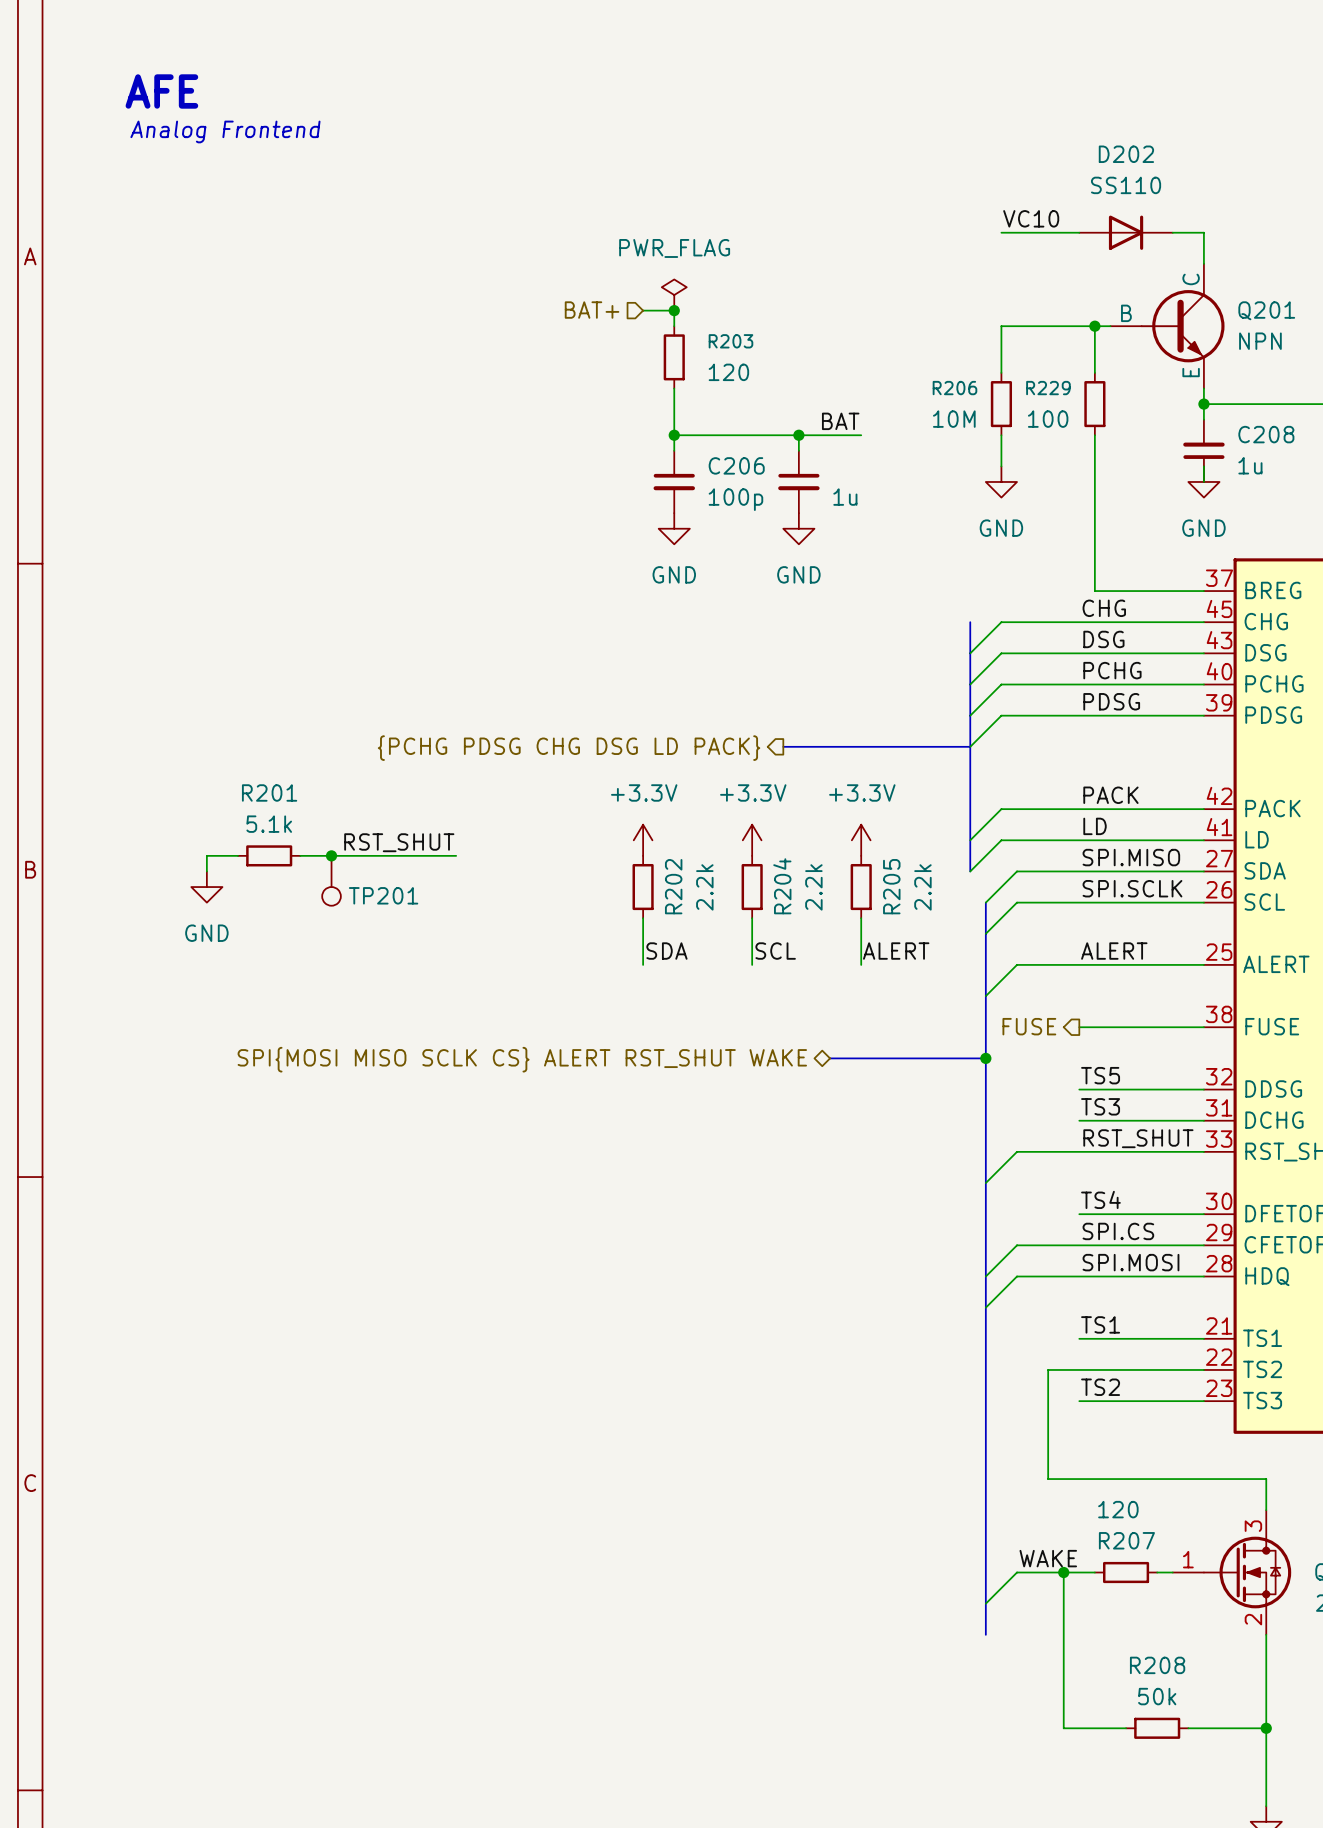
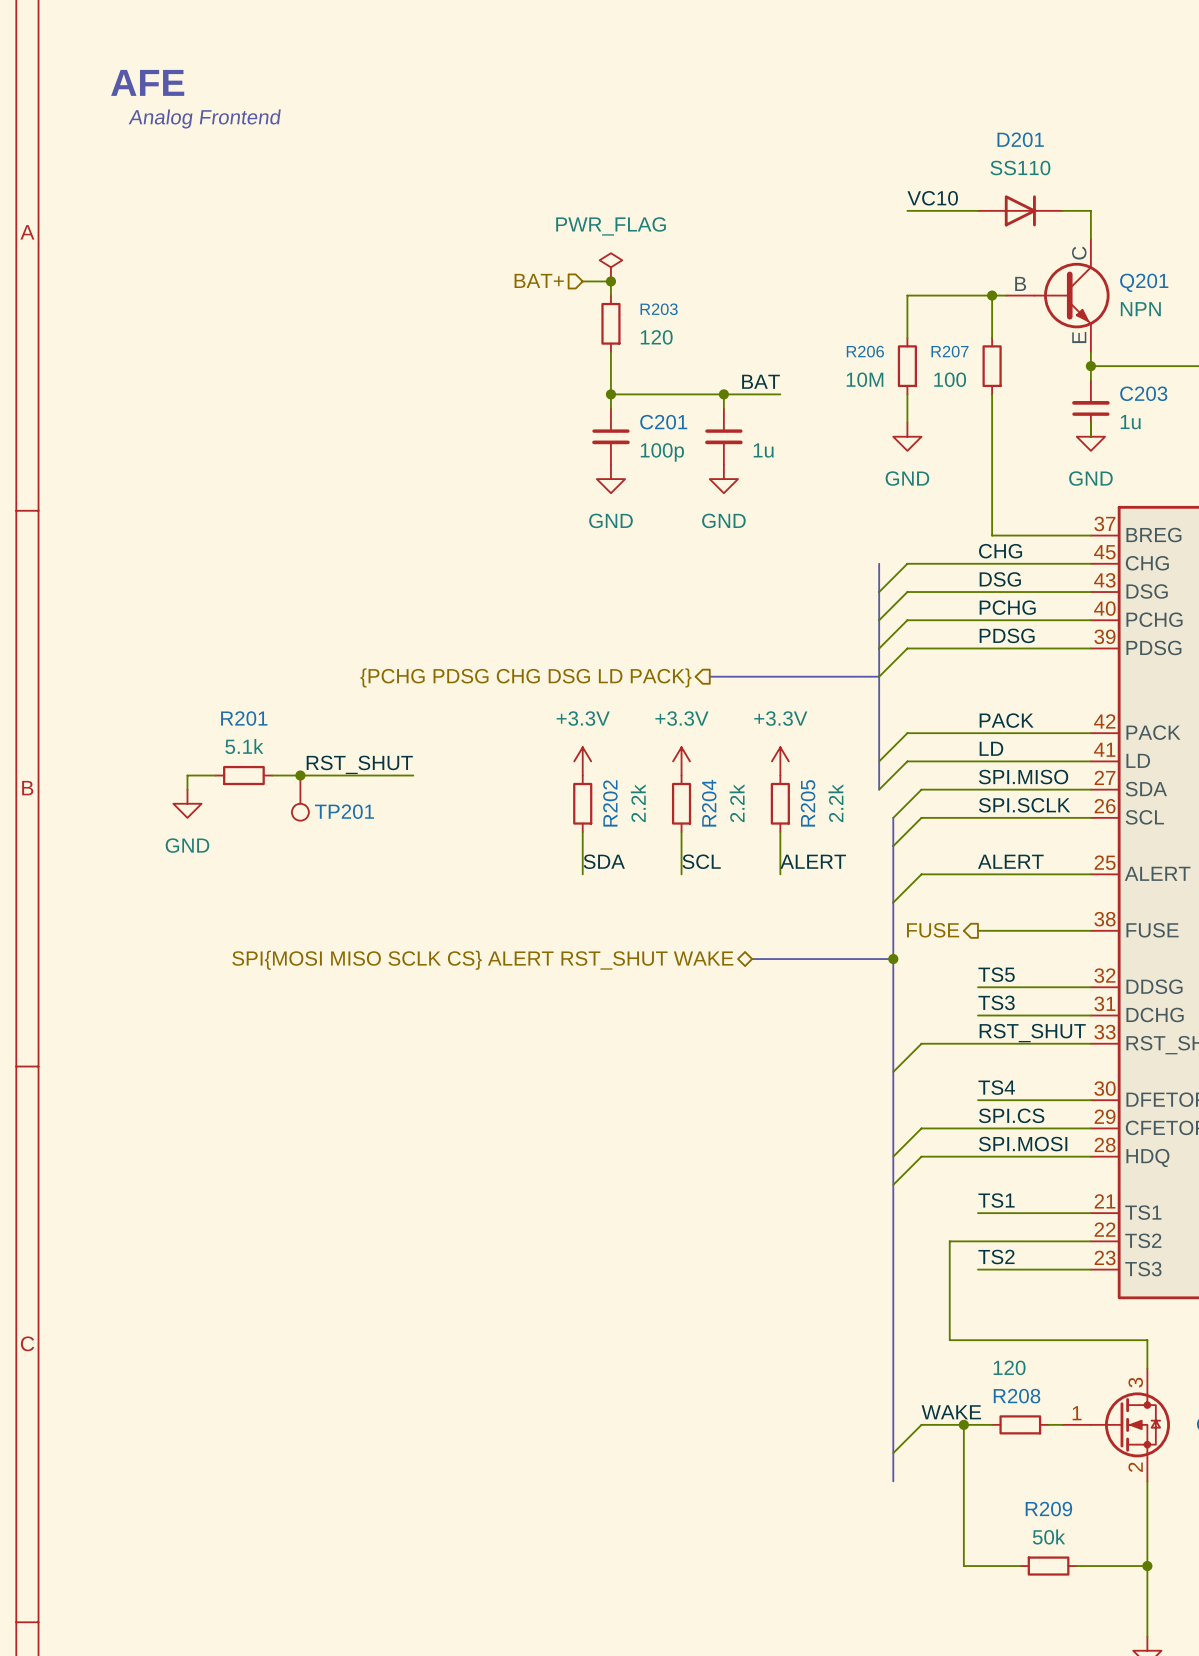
D202 name: D202 (1126, 154) -> D201 (1020, 139)
R229 name: R229 (1048, 388) -> R207 (950, 351)
C208 name: C208 (1266, 434) -> C203 (1143, 393)
C206 name: C206 (736, 465) -> C201 (663, 422)
R207 name: R207 (1126, 1540) -> R208 (1017, 1396)
R208 name: R208 (1157, 1665) -> R209 (1048, 1509)

